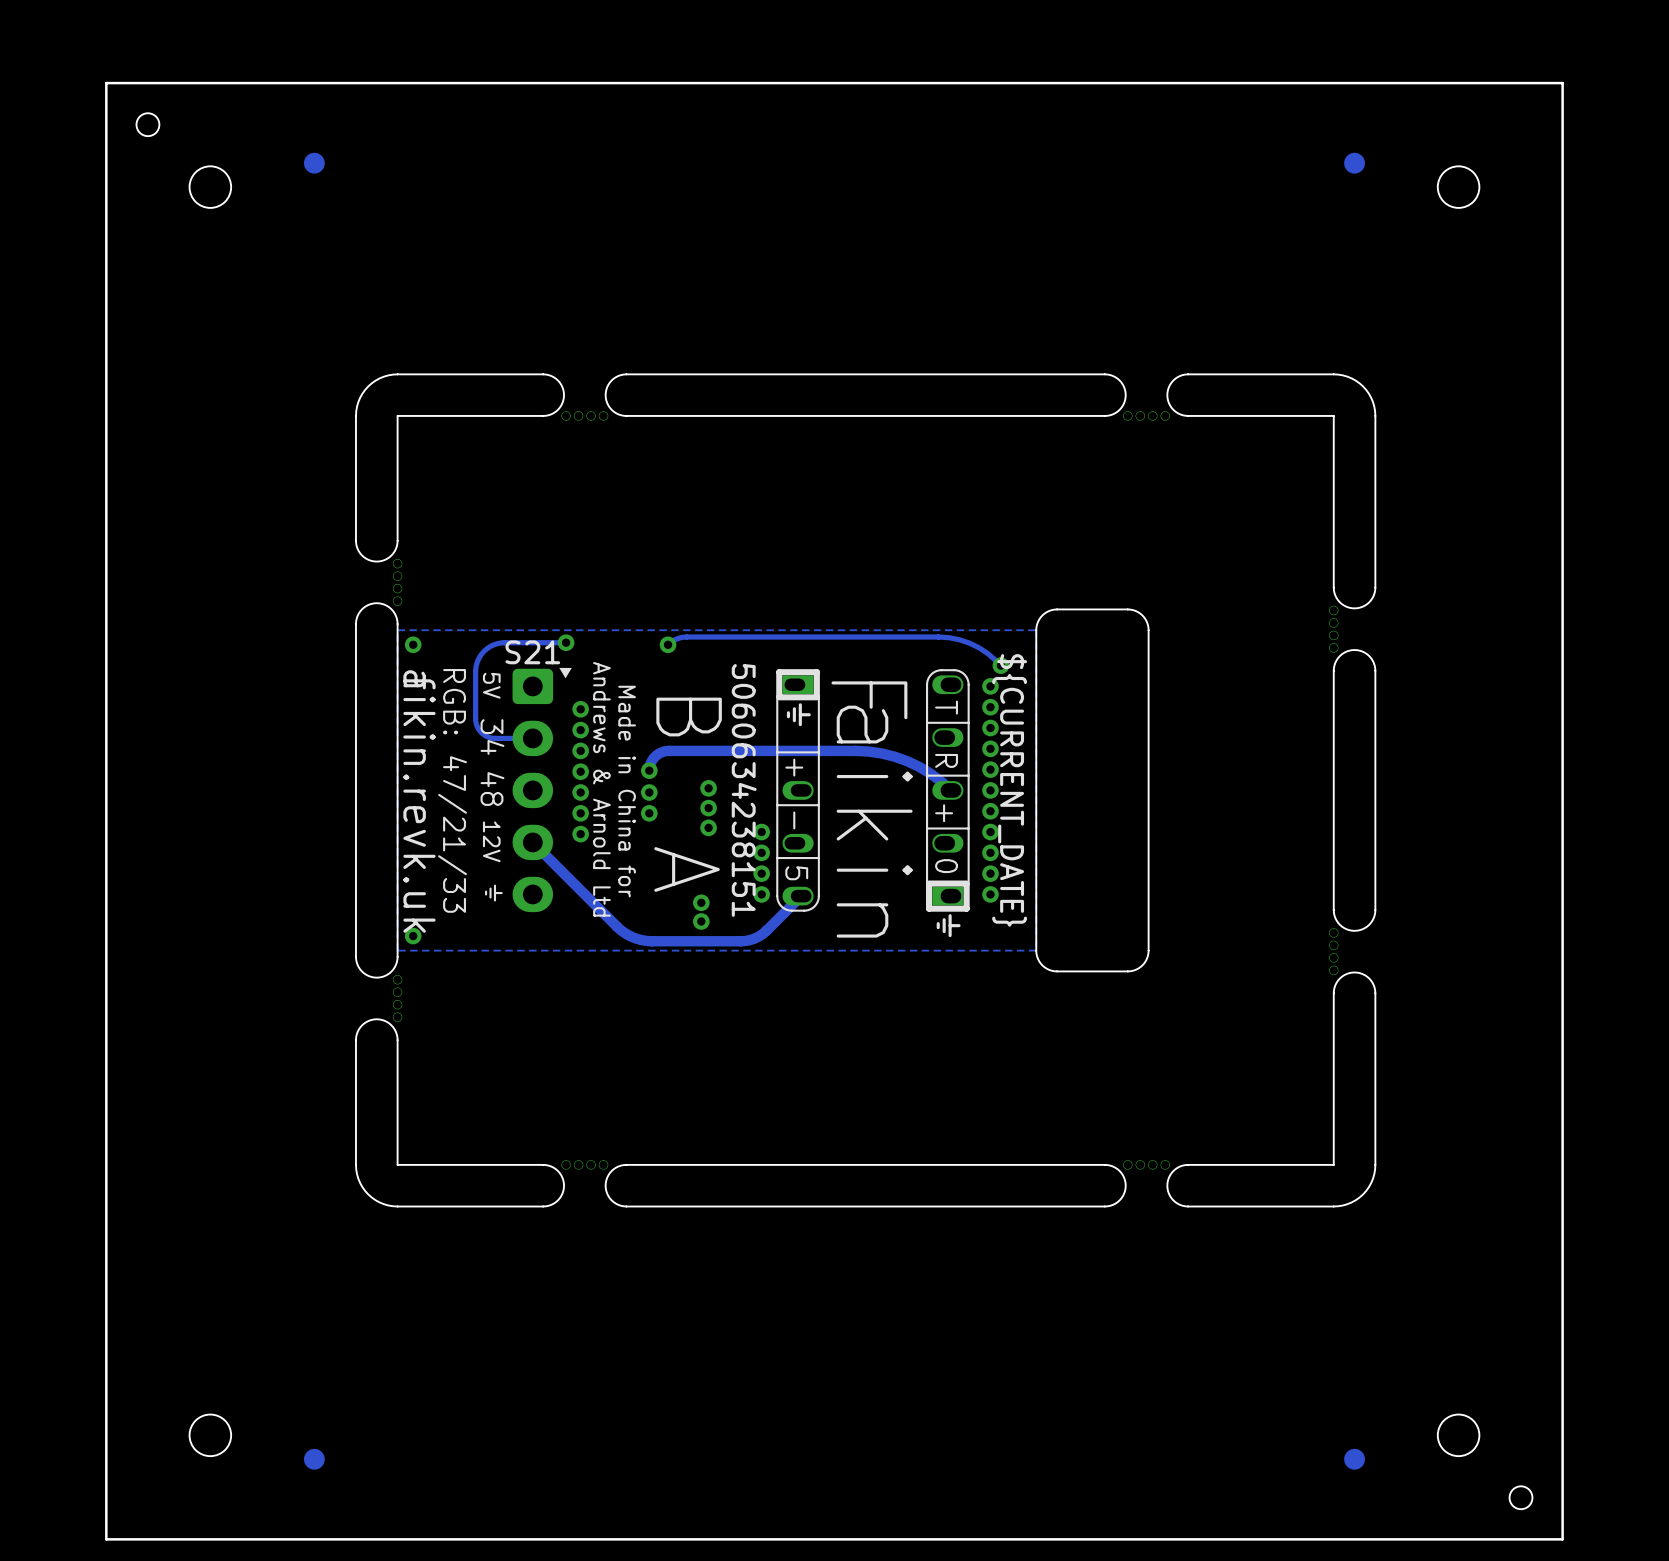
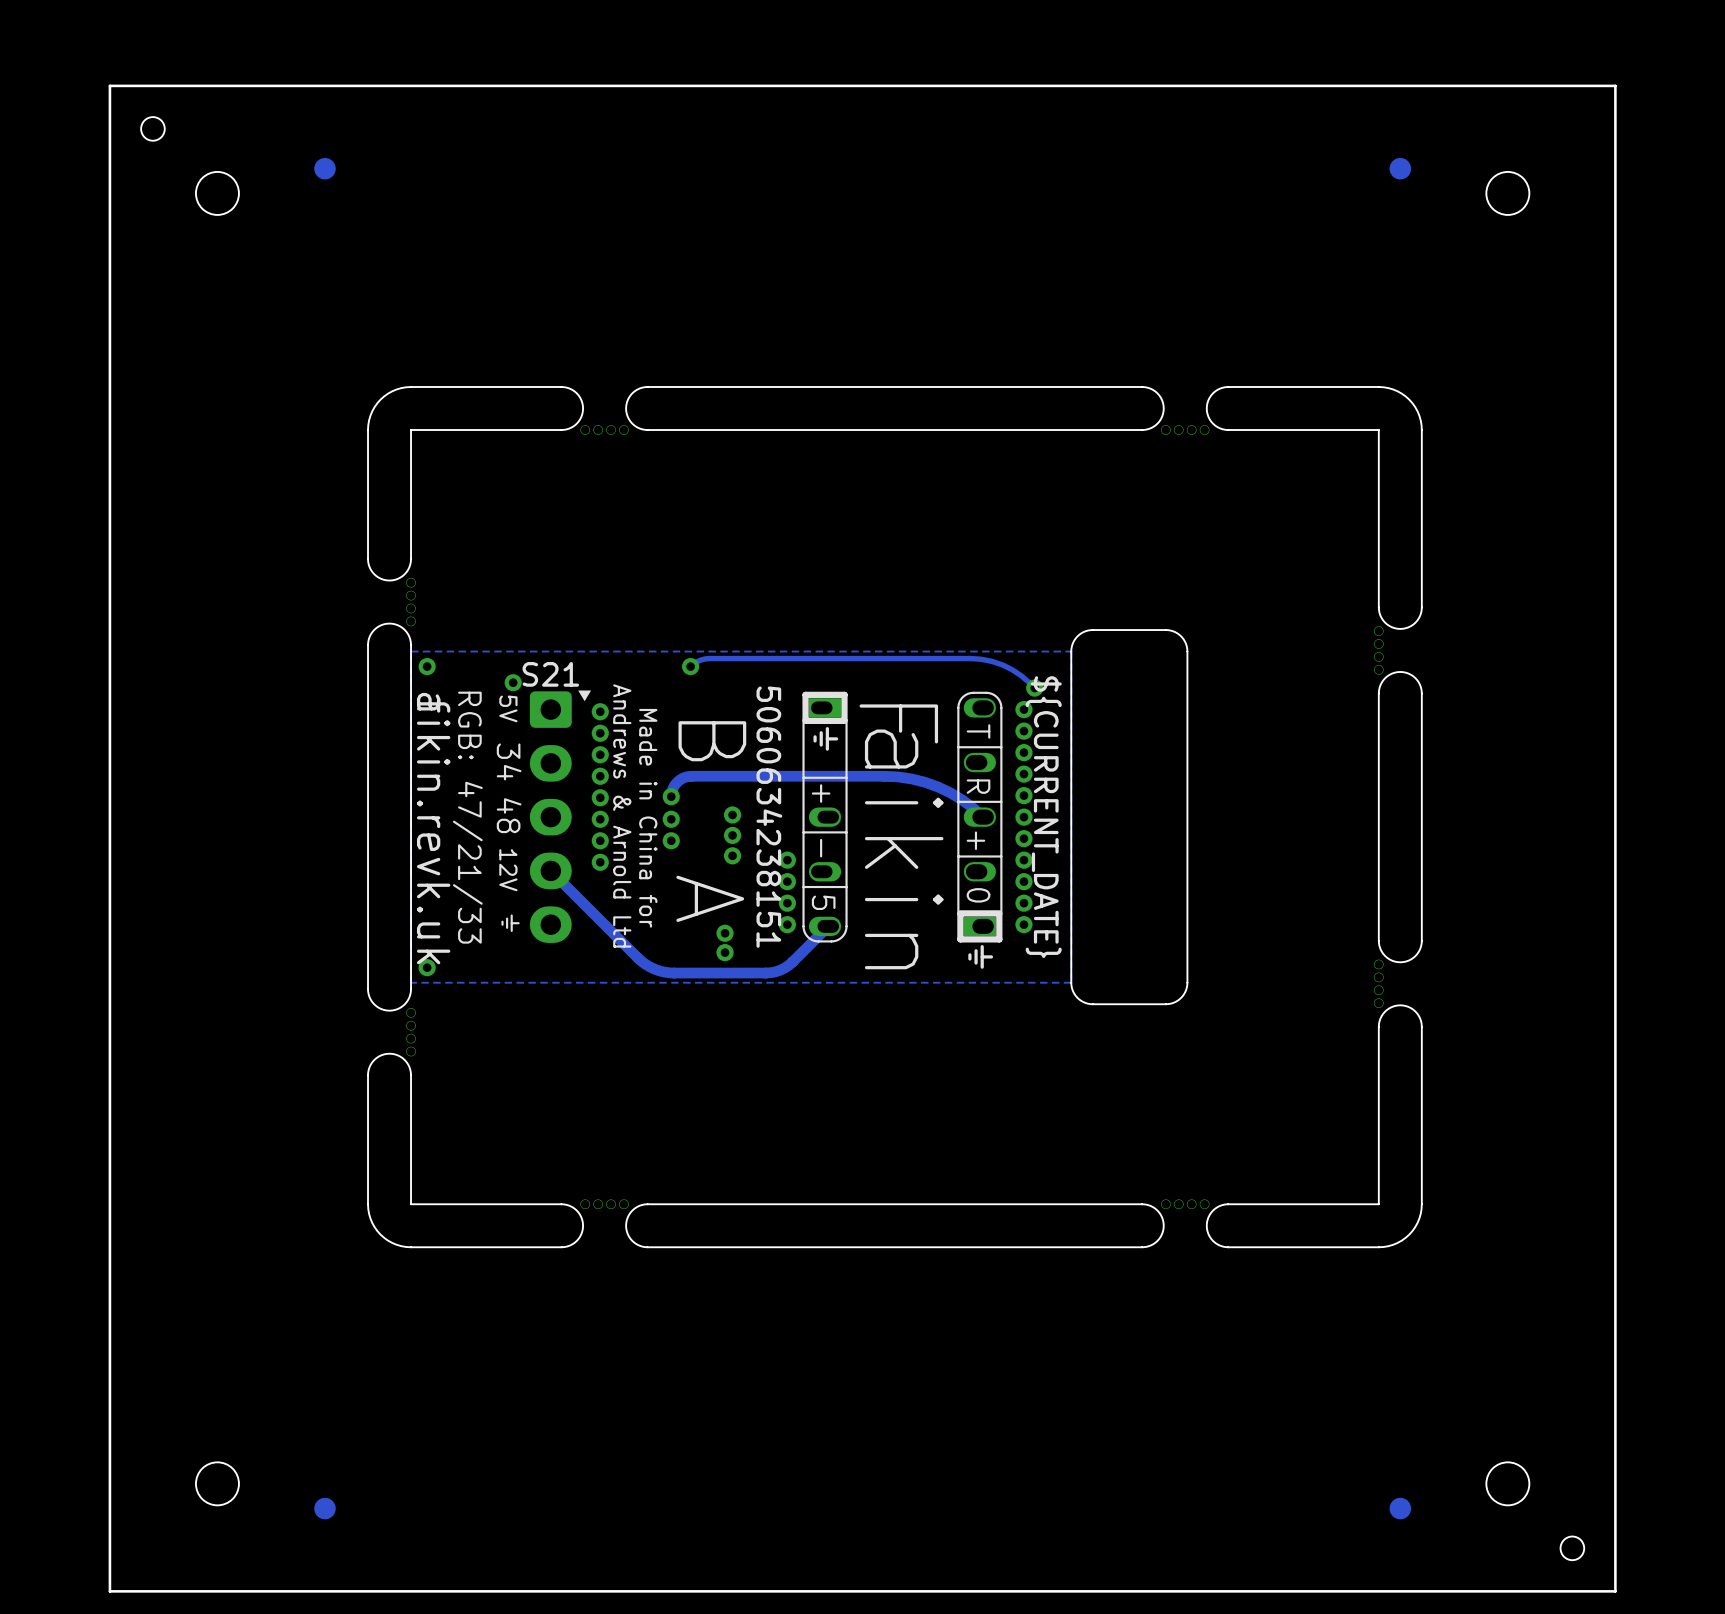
track: (566, 642) (497, 643) (484, 651) (477, 660) (475, 671) (475, 718) (479, 730) (485, 735) (492, 738) (532, 738) -> none
via: (566, 642) -> none
via: none -> (513, 682)
via: none -> (600, 711)

